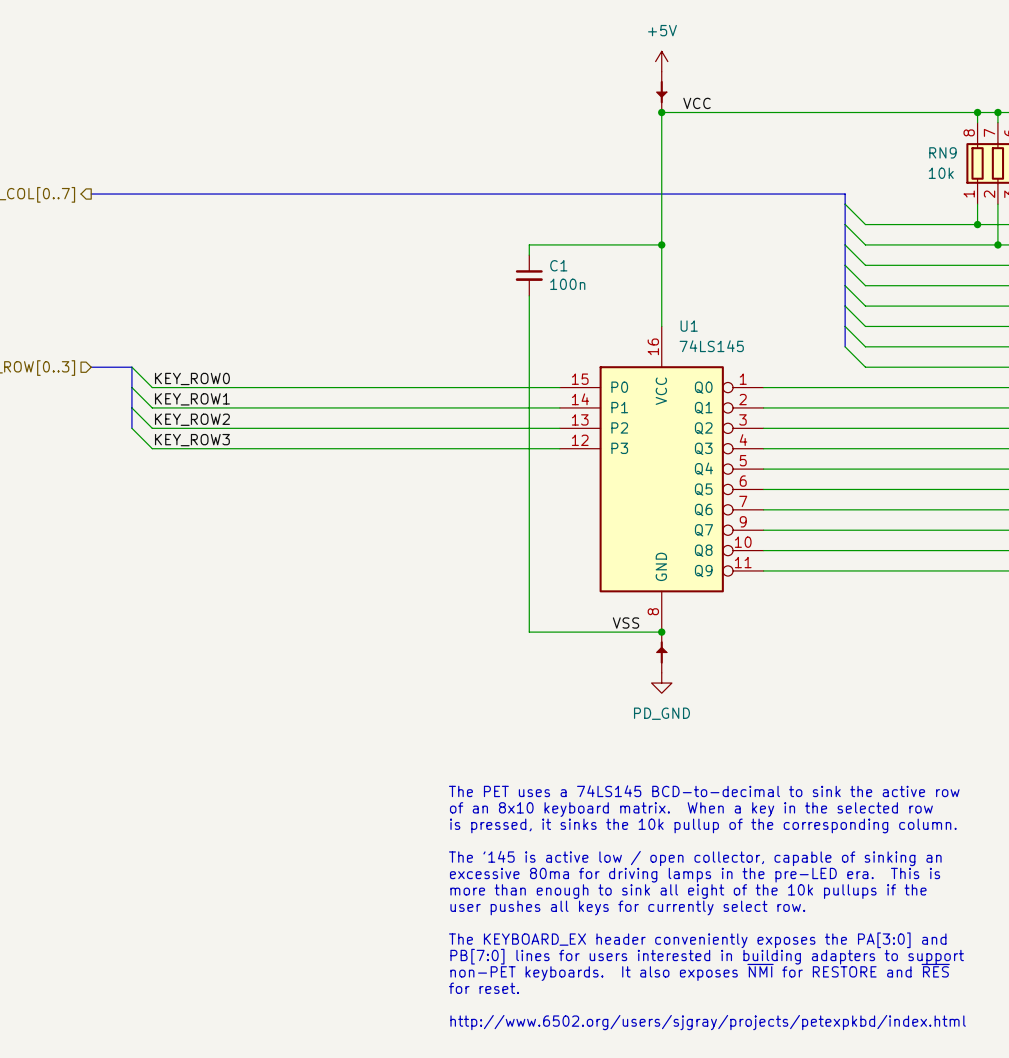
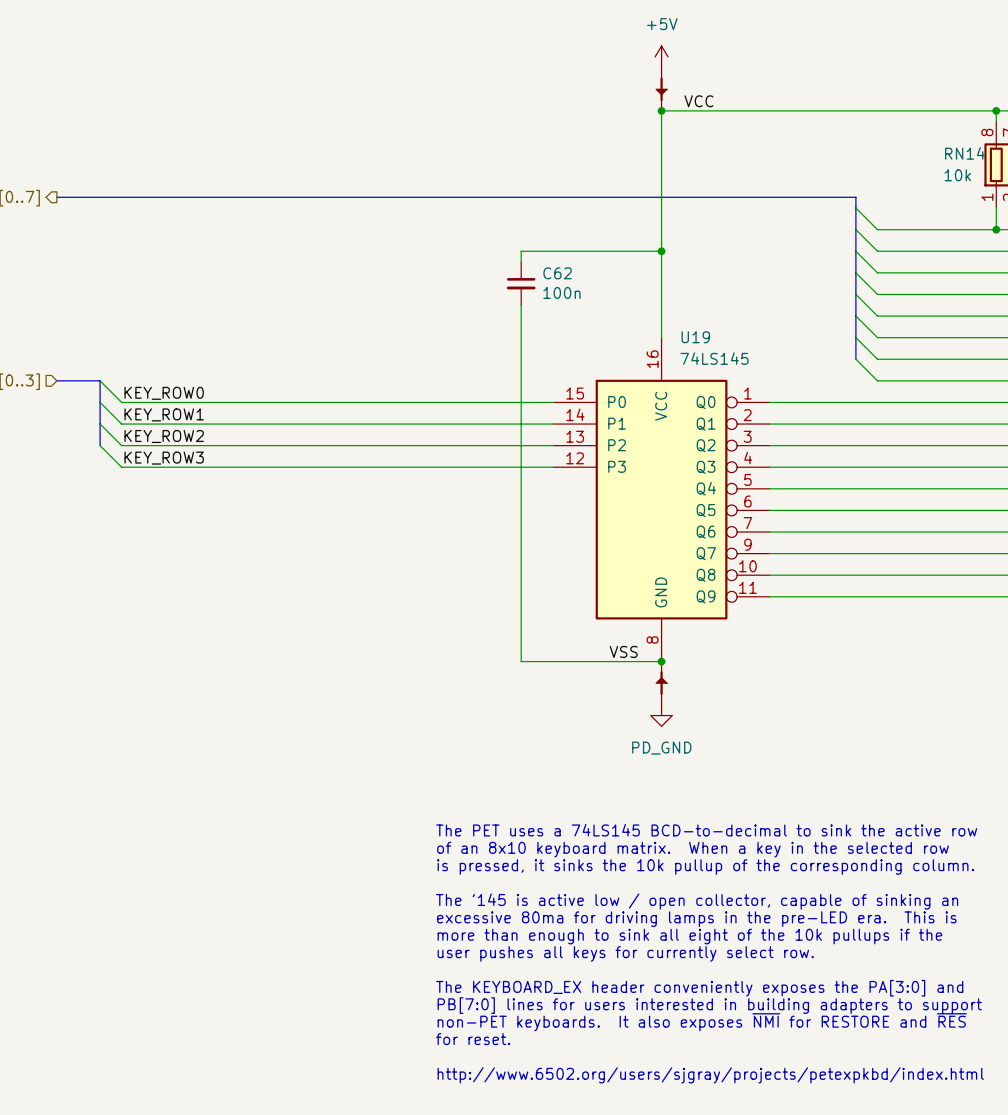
RN9 name: RN9 (942, 152) -> RN14 (965, 153)
C1 name: C1 (558, 265) -> C62 (557, 273)
U1 name: U1 (689, 326) -> U19 (695, 337)

